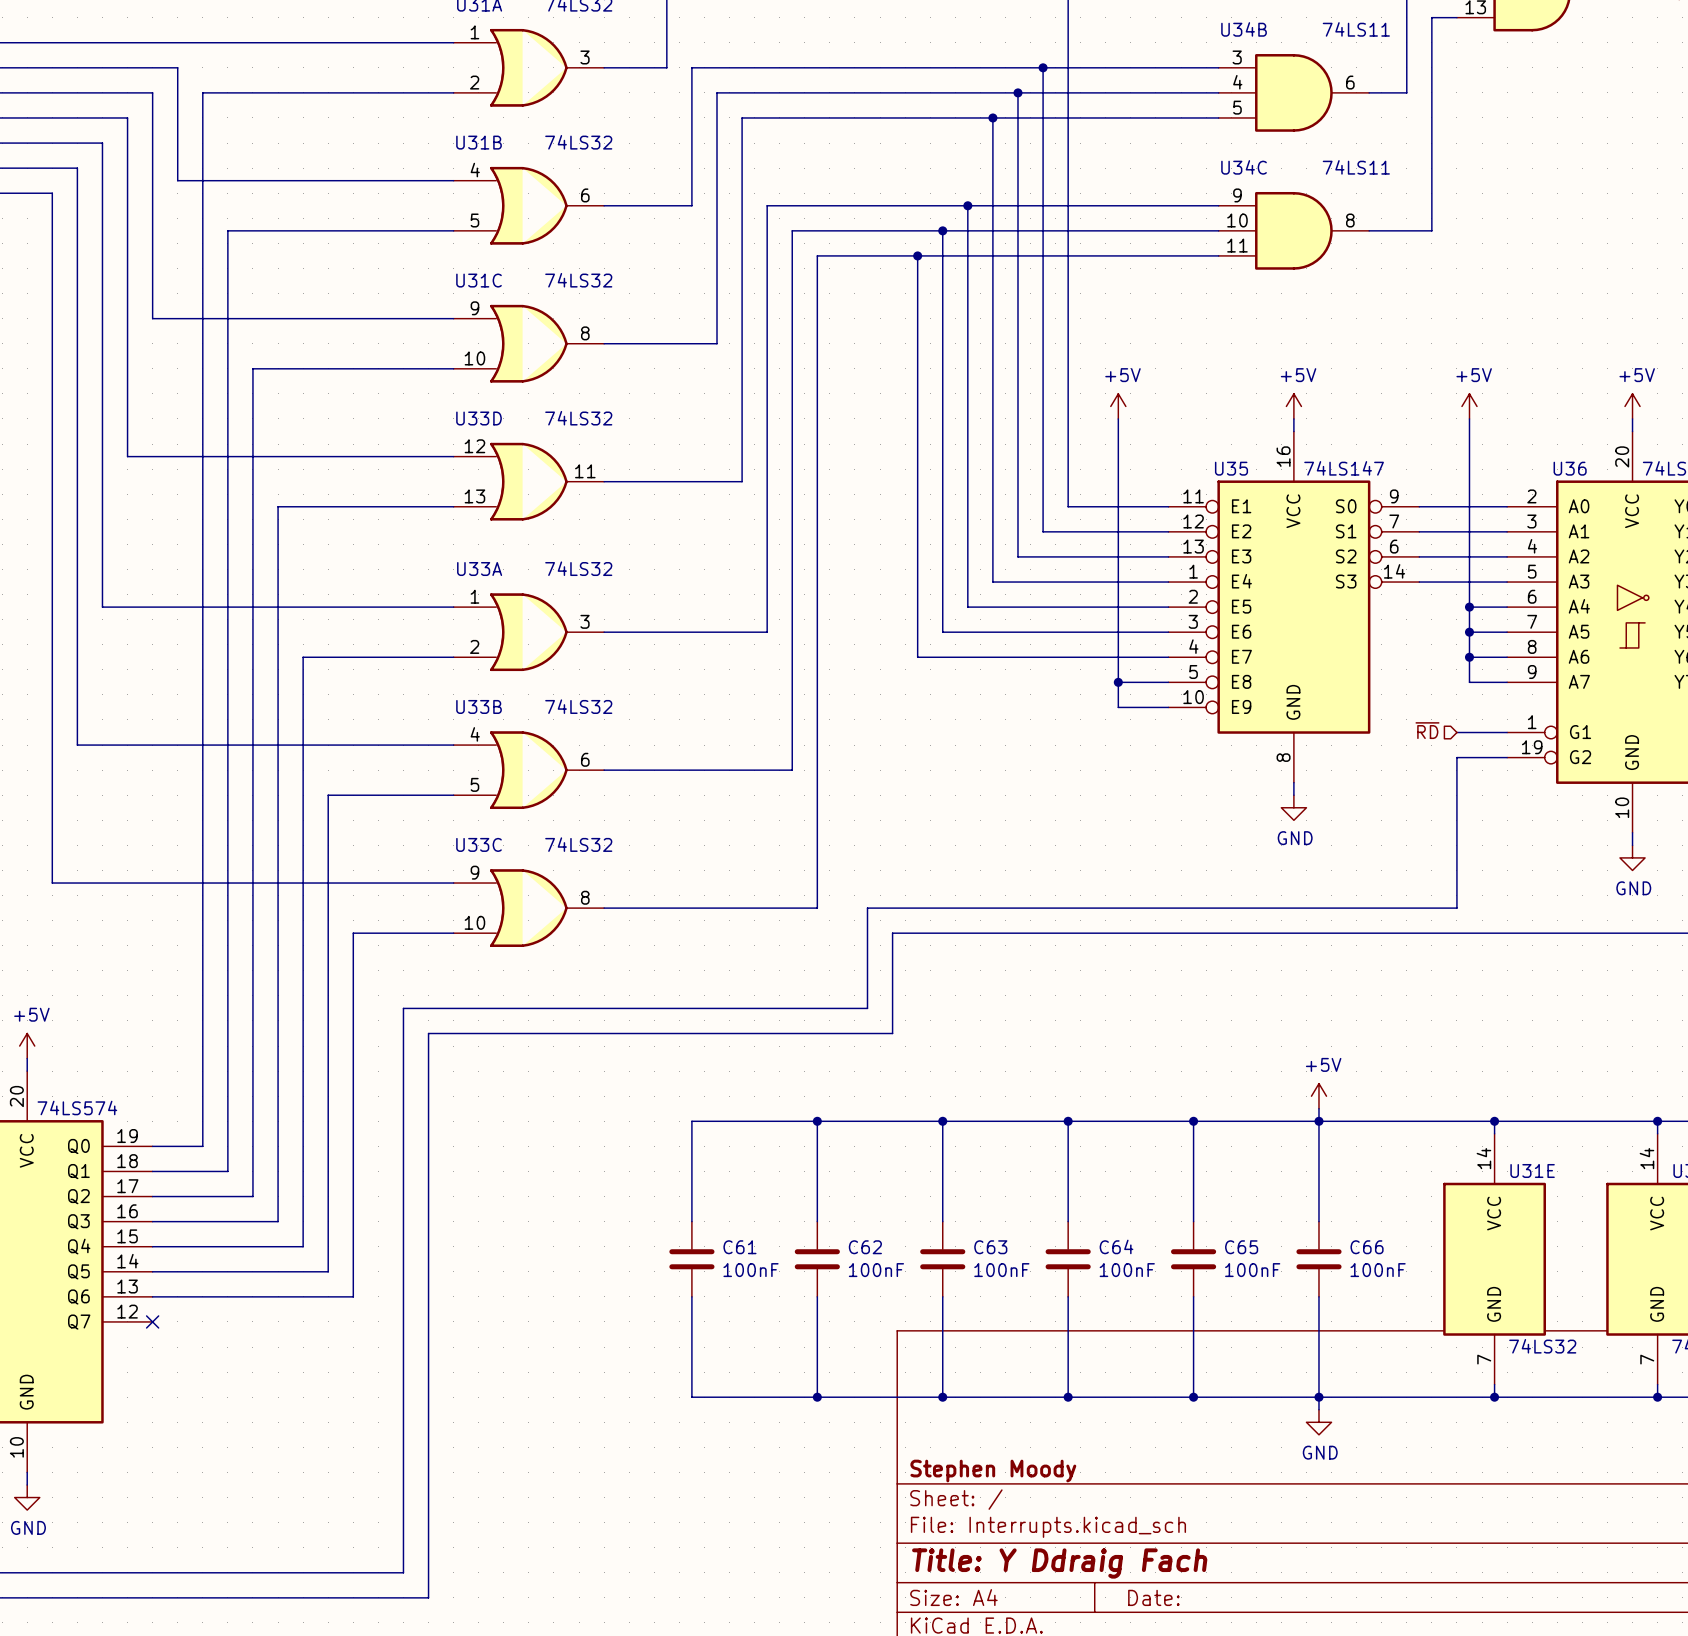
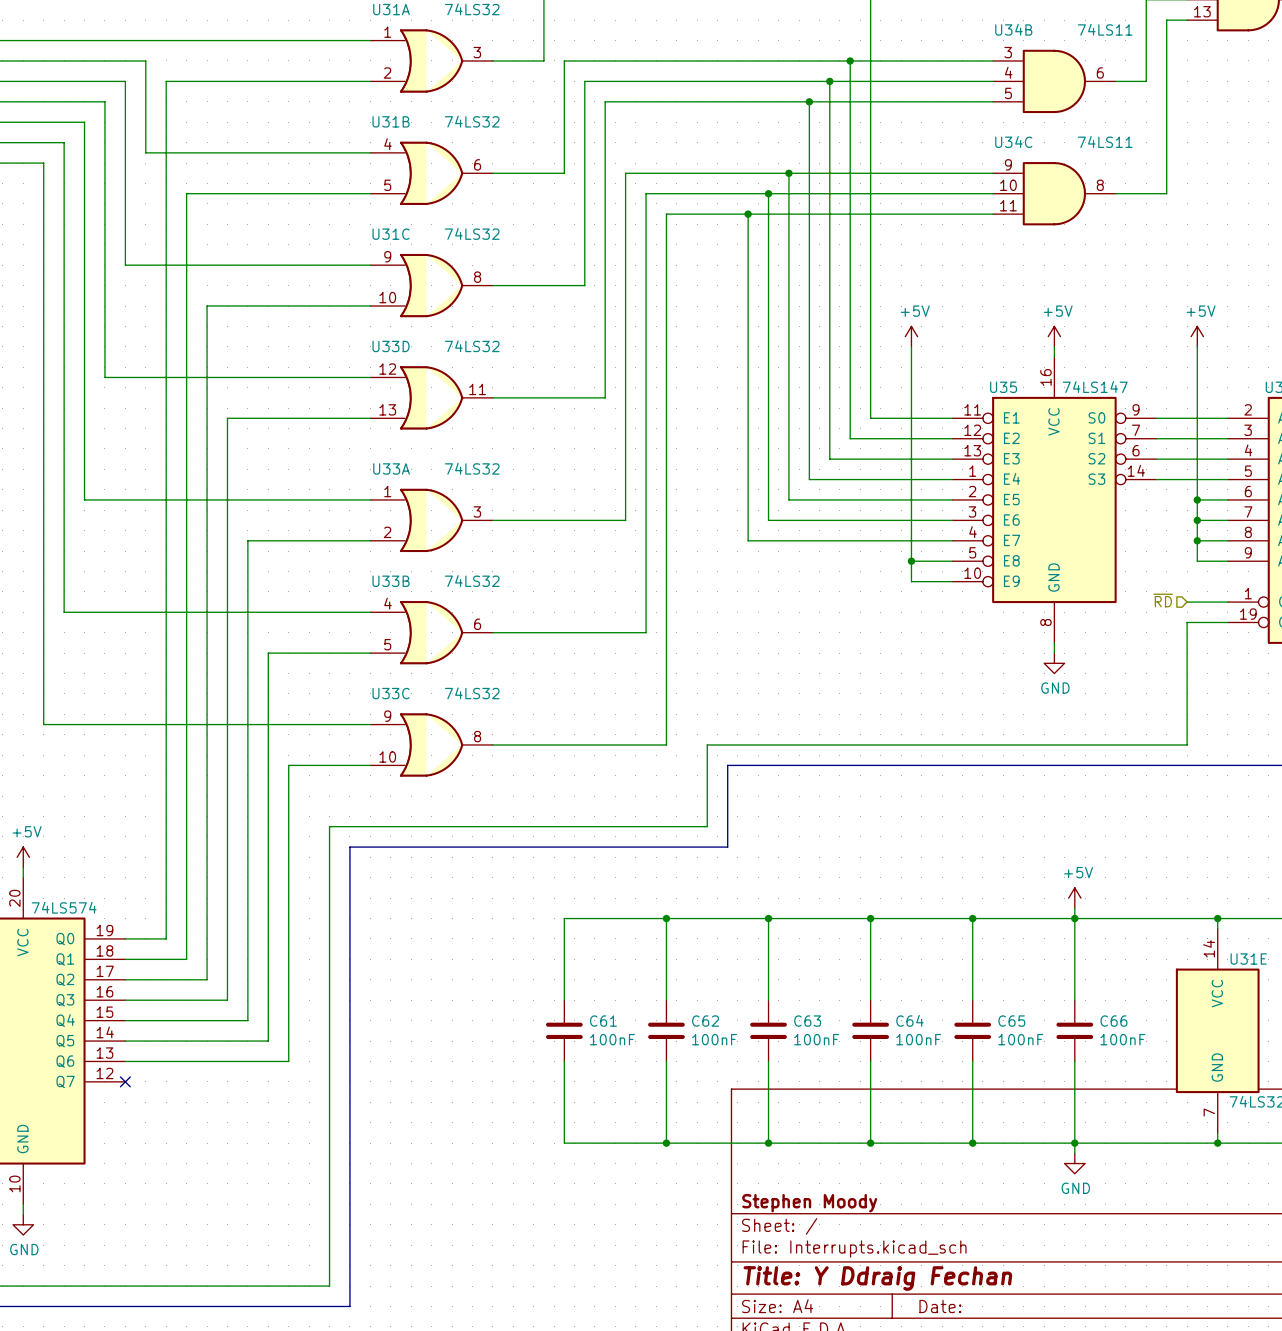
title block: Title: Y Ddraig Fach (1059, 1563) -> Title: Y Ddraig Fechan (877, 1278)

